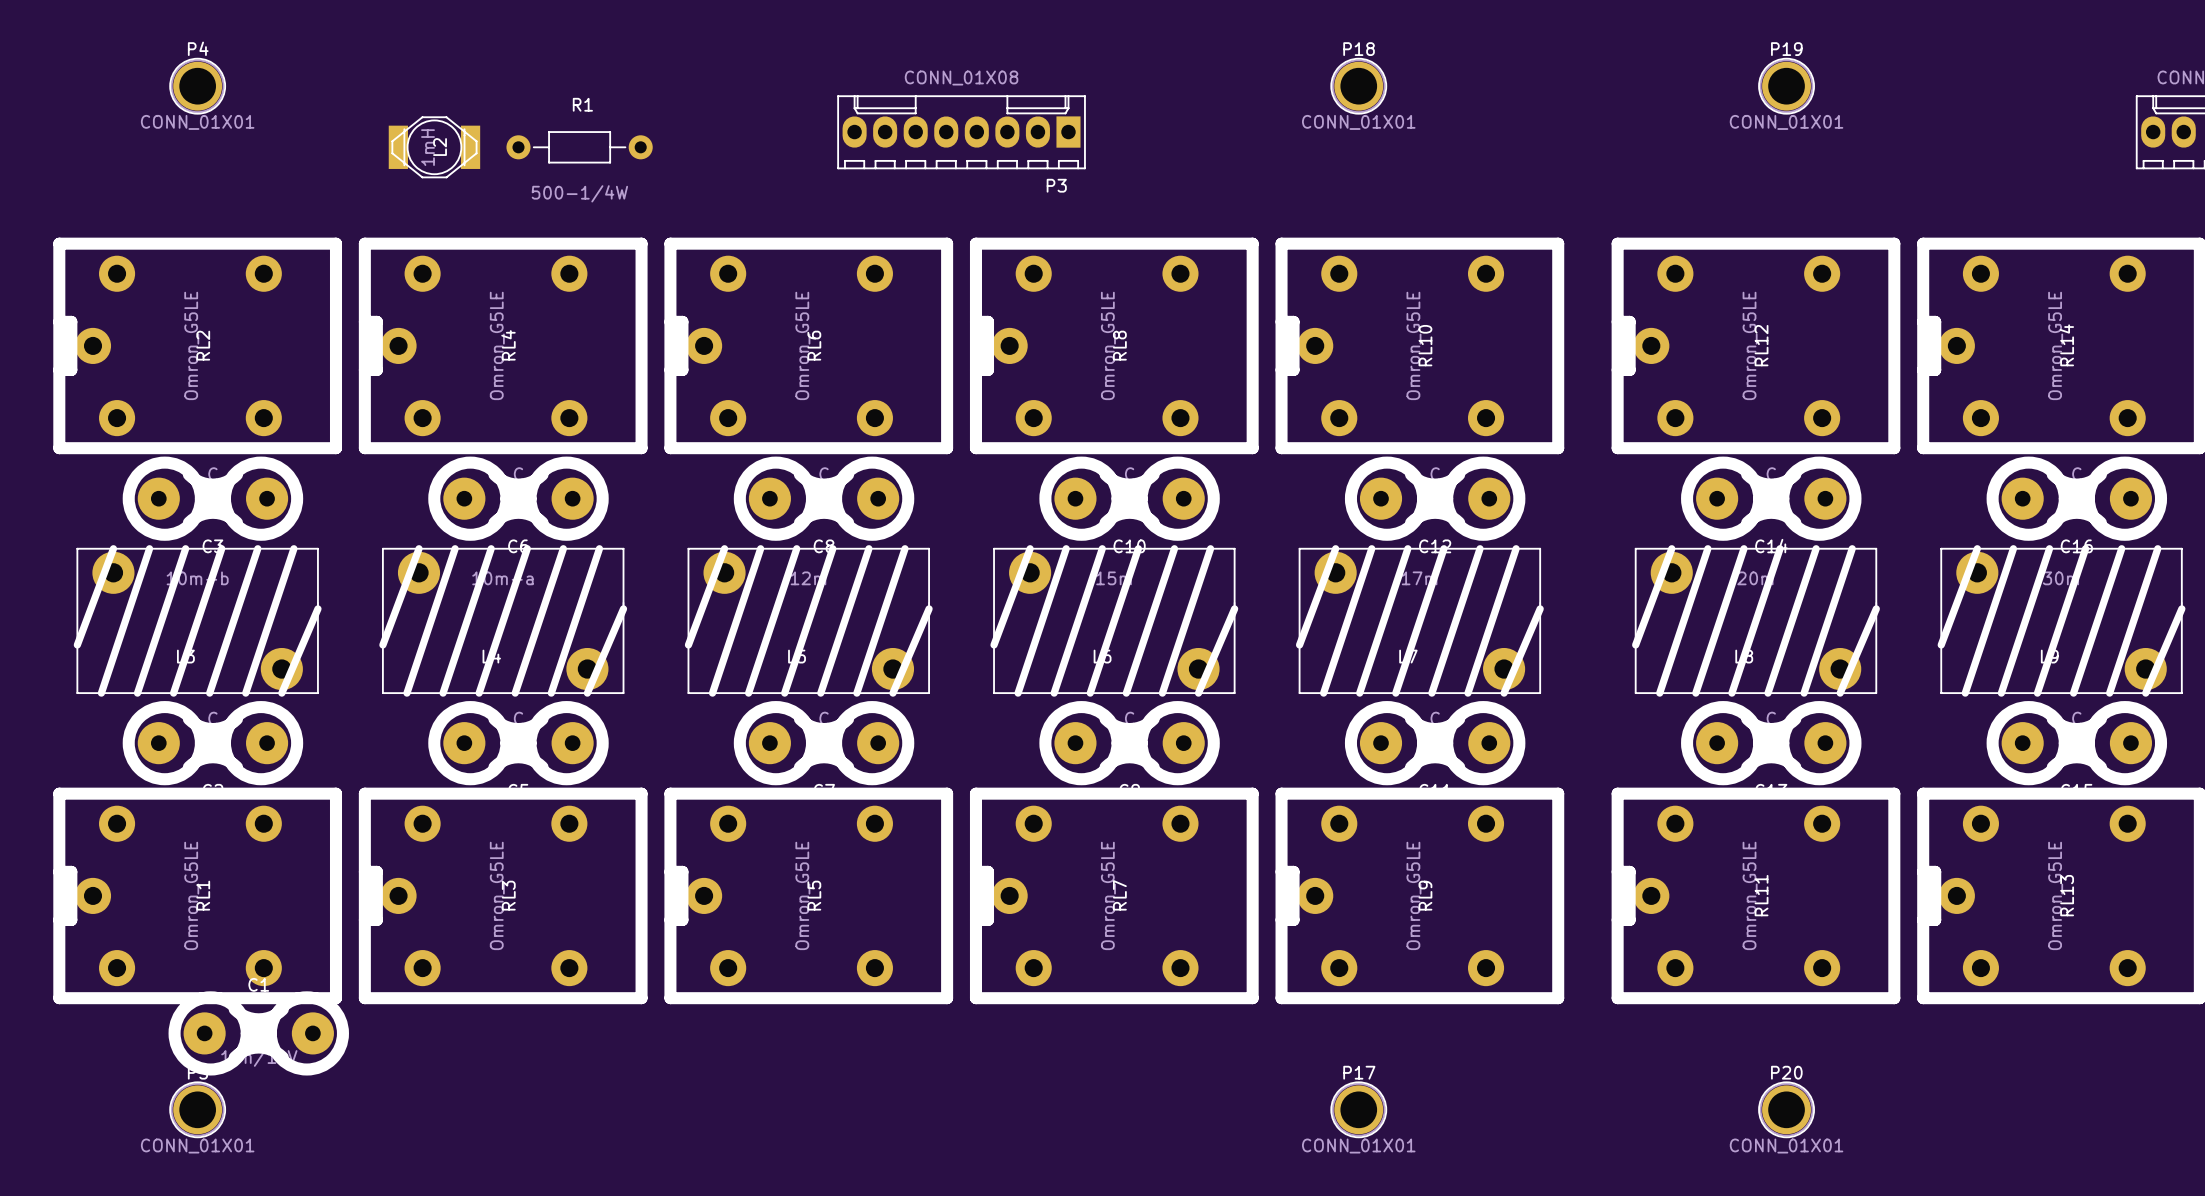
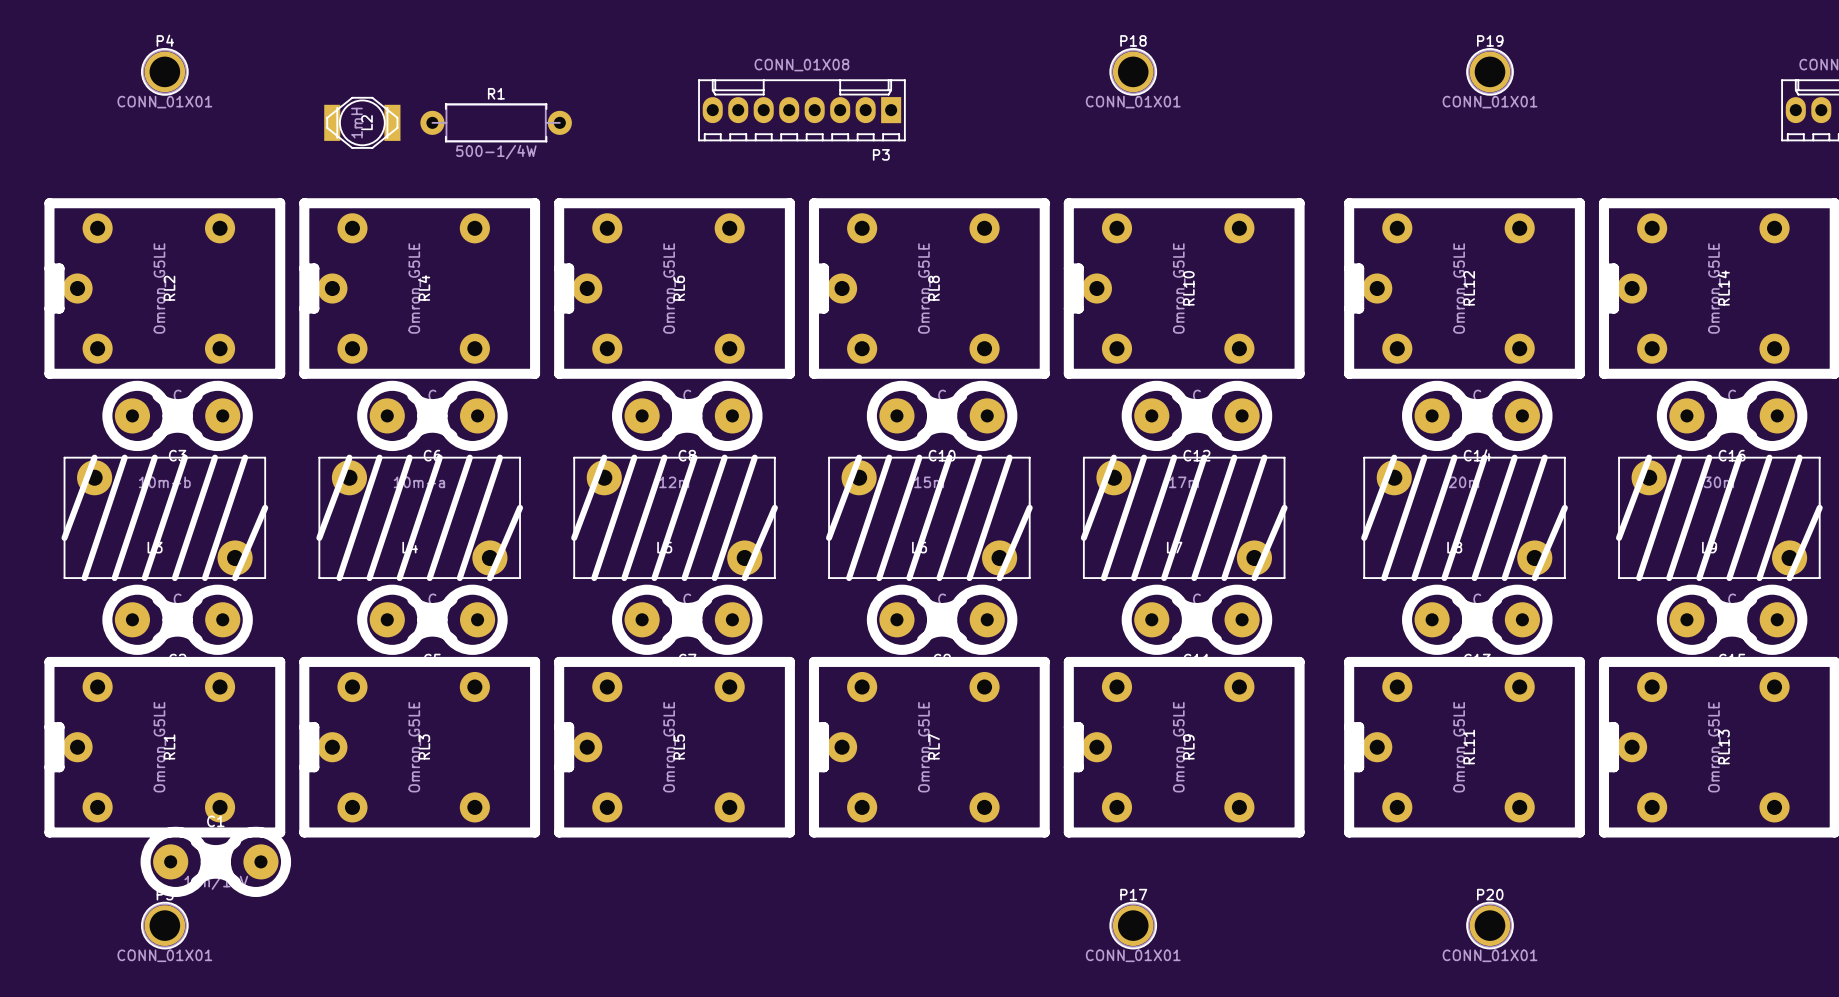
R1 footprint: [506, 131, 653, 164] -> [420, 103, 572, 143]

